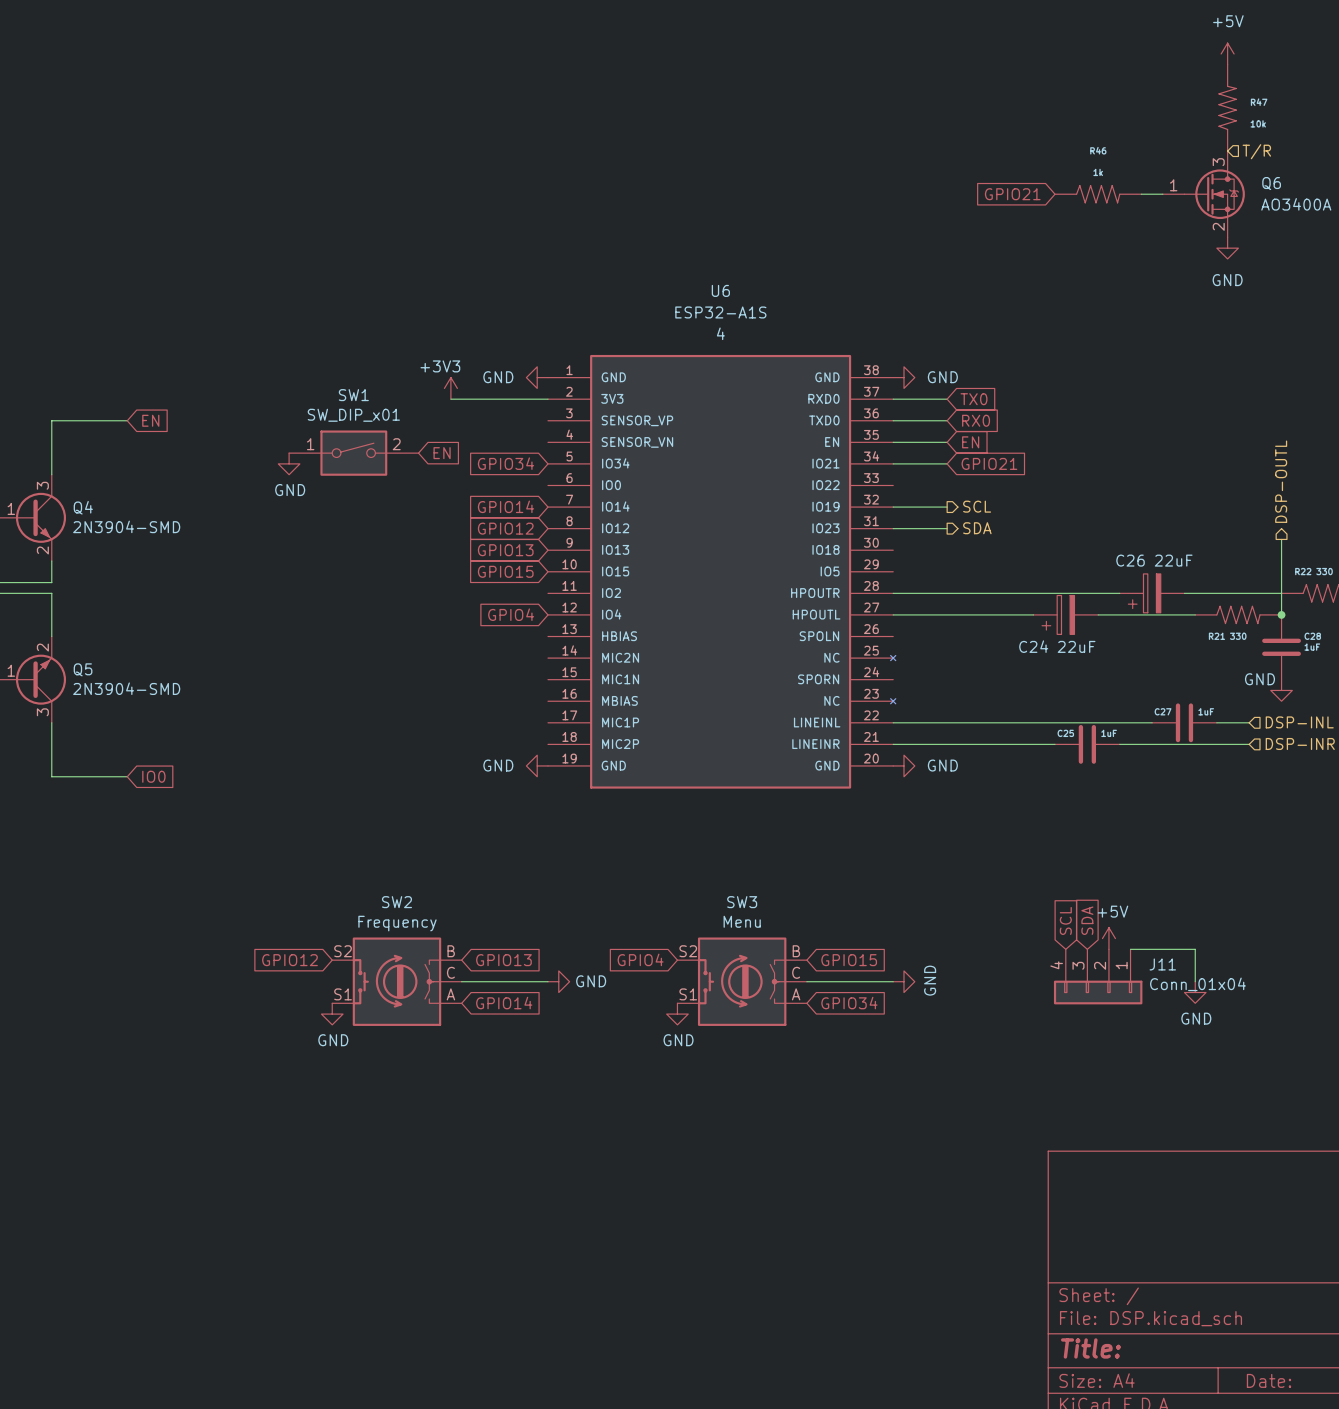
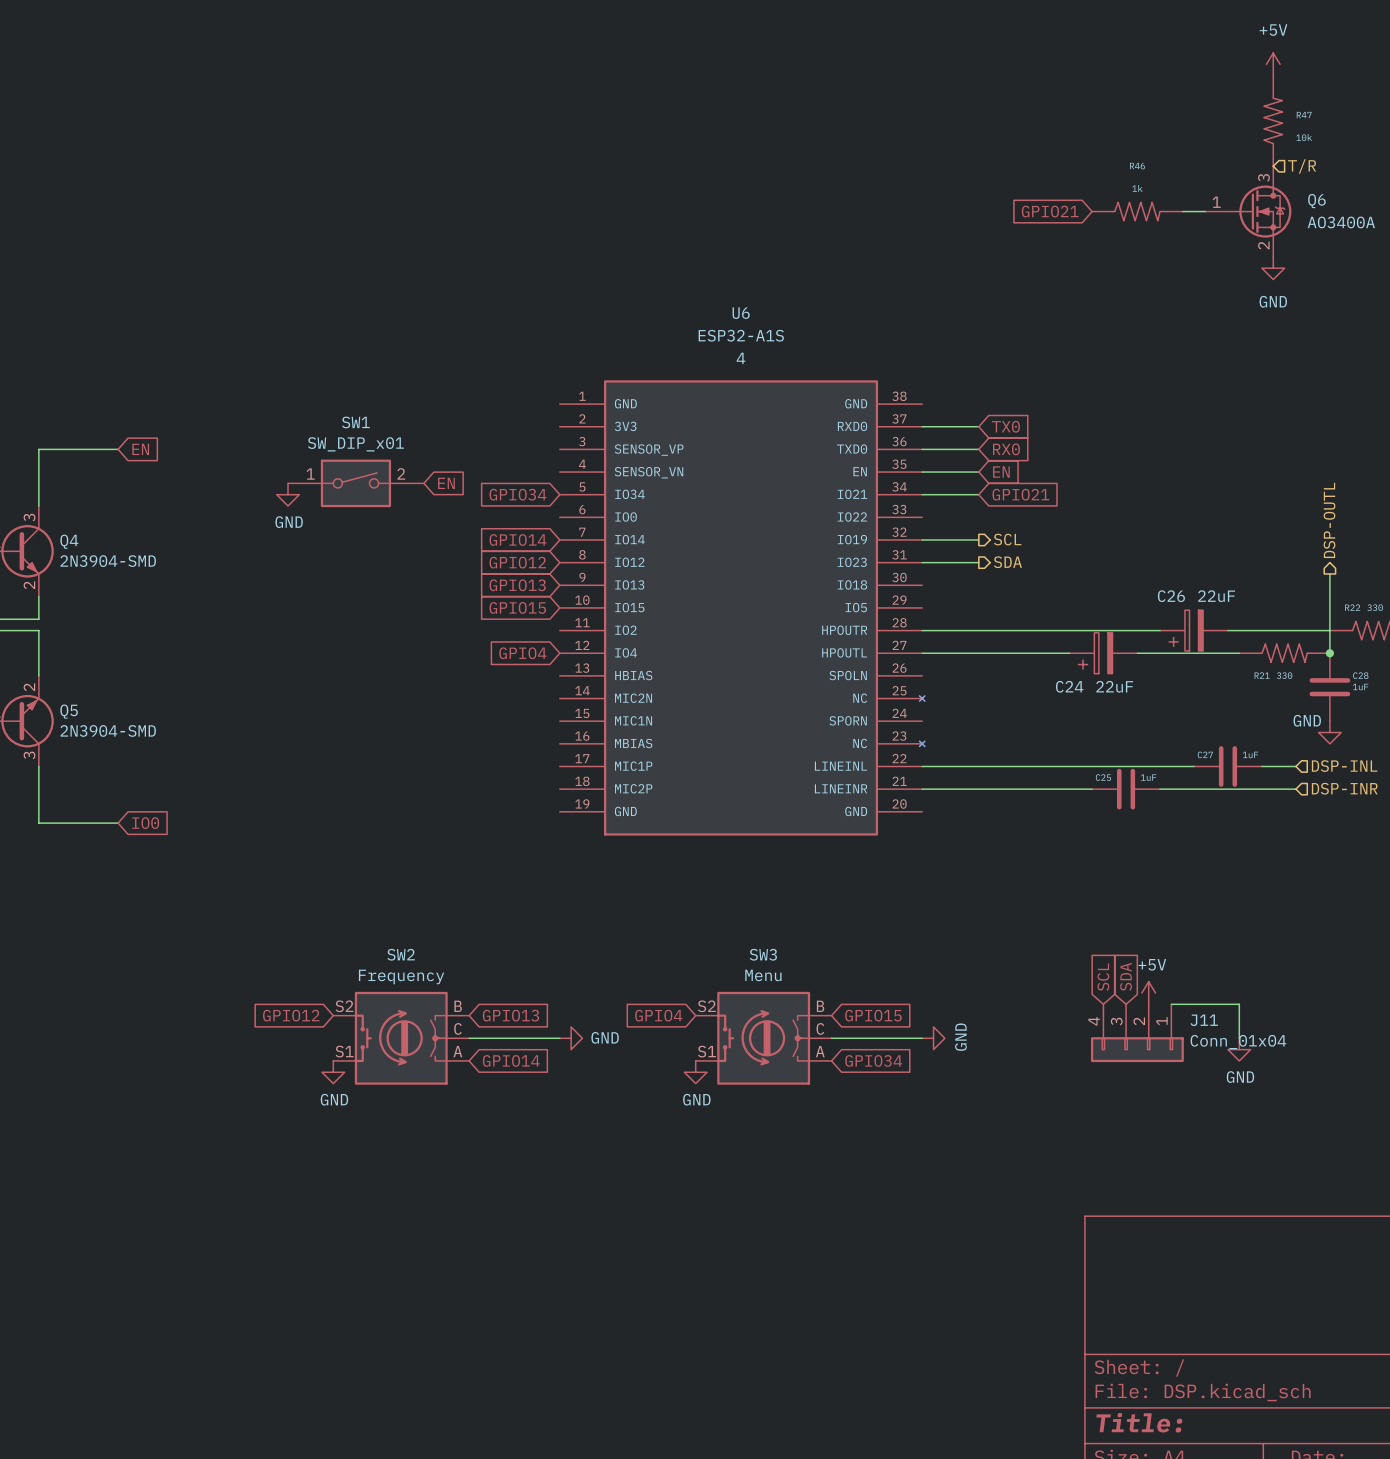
power symbol: GND (537, 377) -> none
power symbol: GND (903, 377) -> none
power symbol: +3V3 (450, 388) -> none
wire: (450, 399) (548, 399) -> none
power symbol: GND (537, 765) -> none
power symbol: GND (903, 765) -> none

